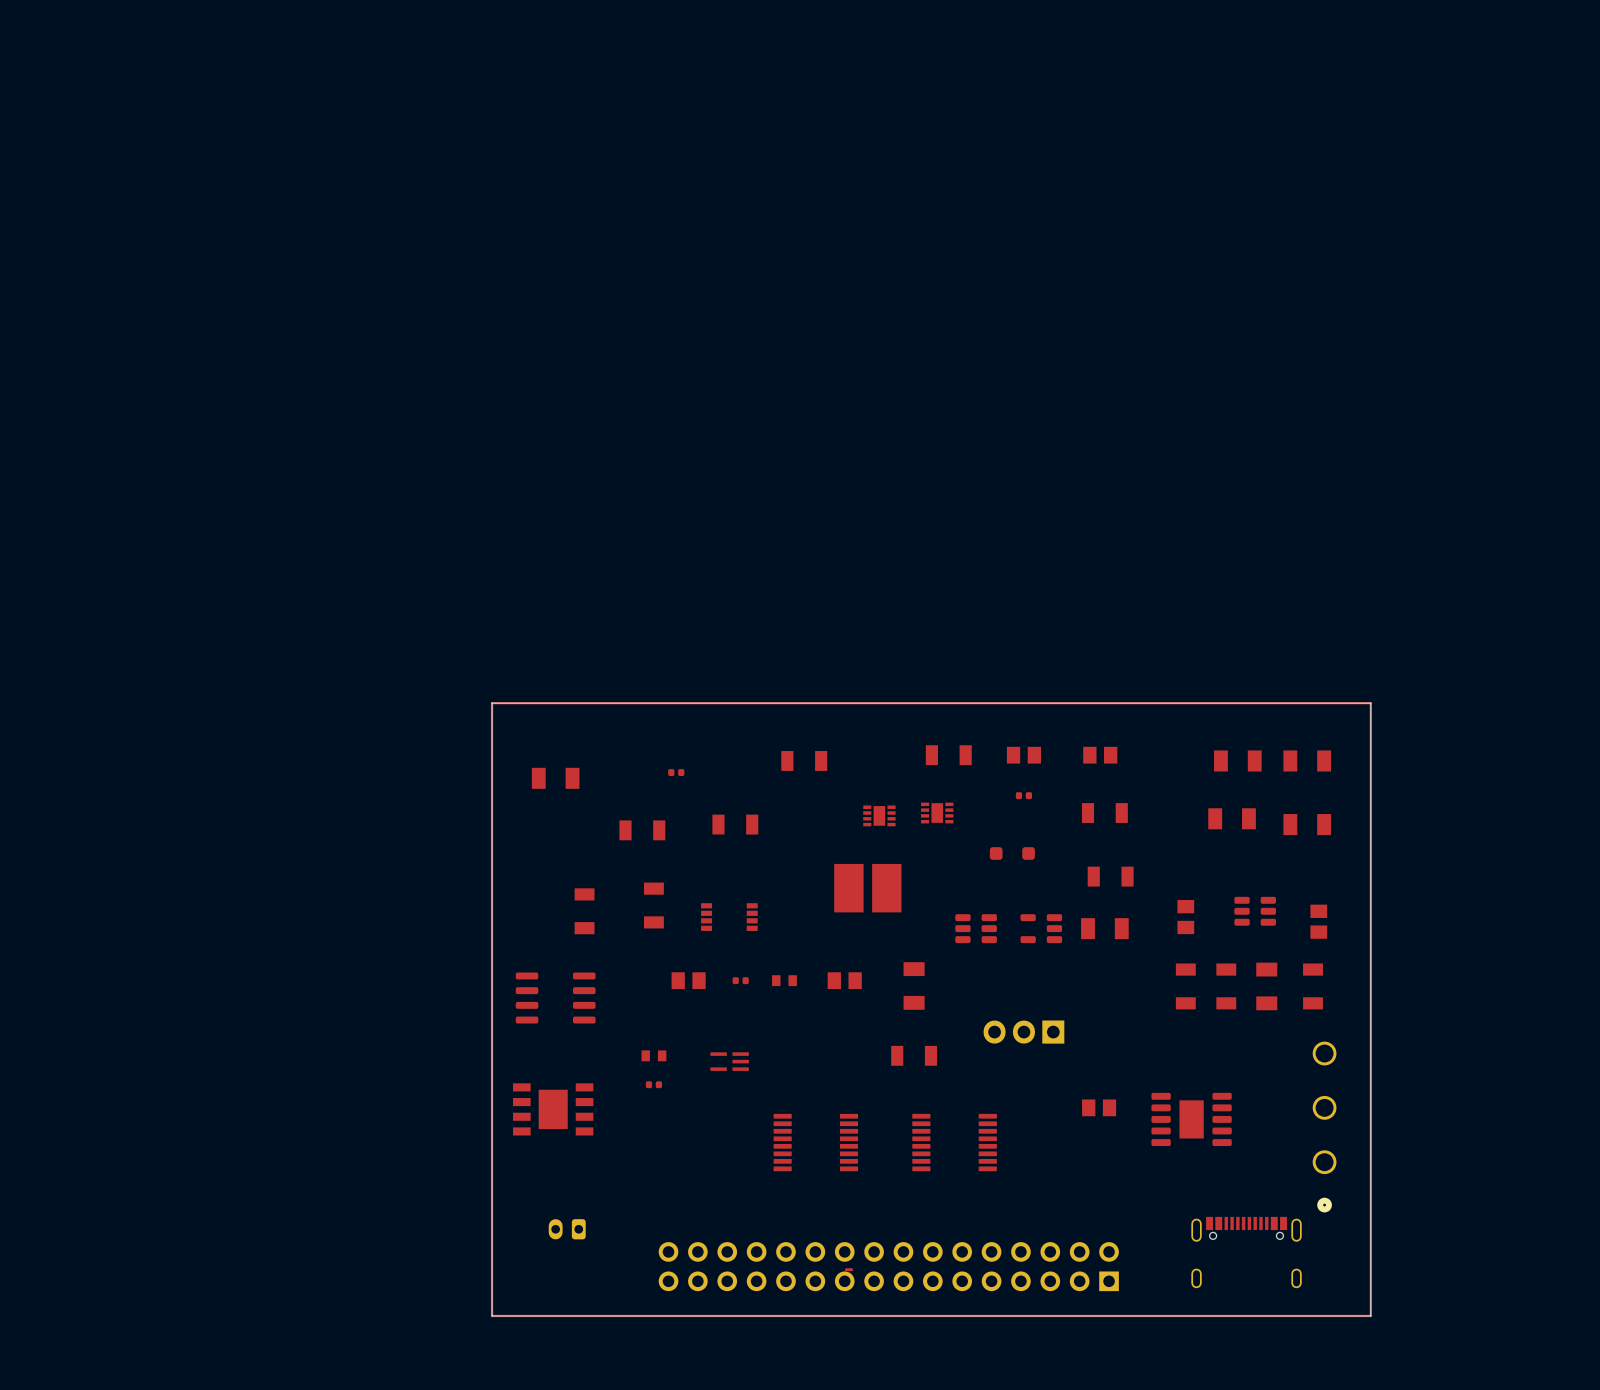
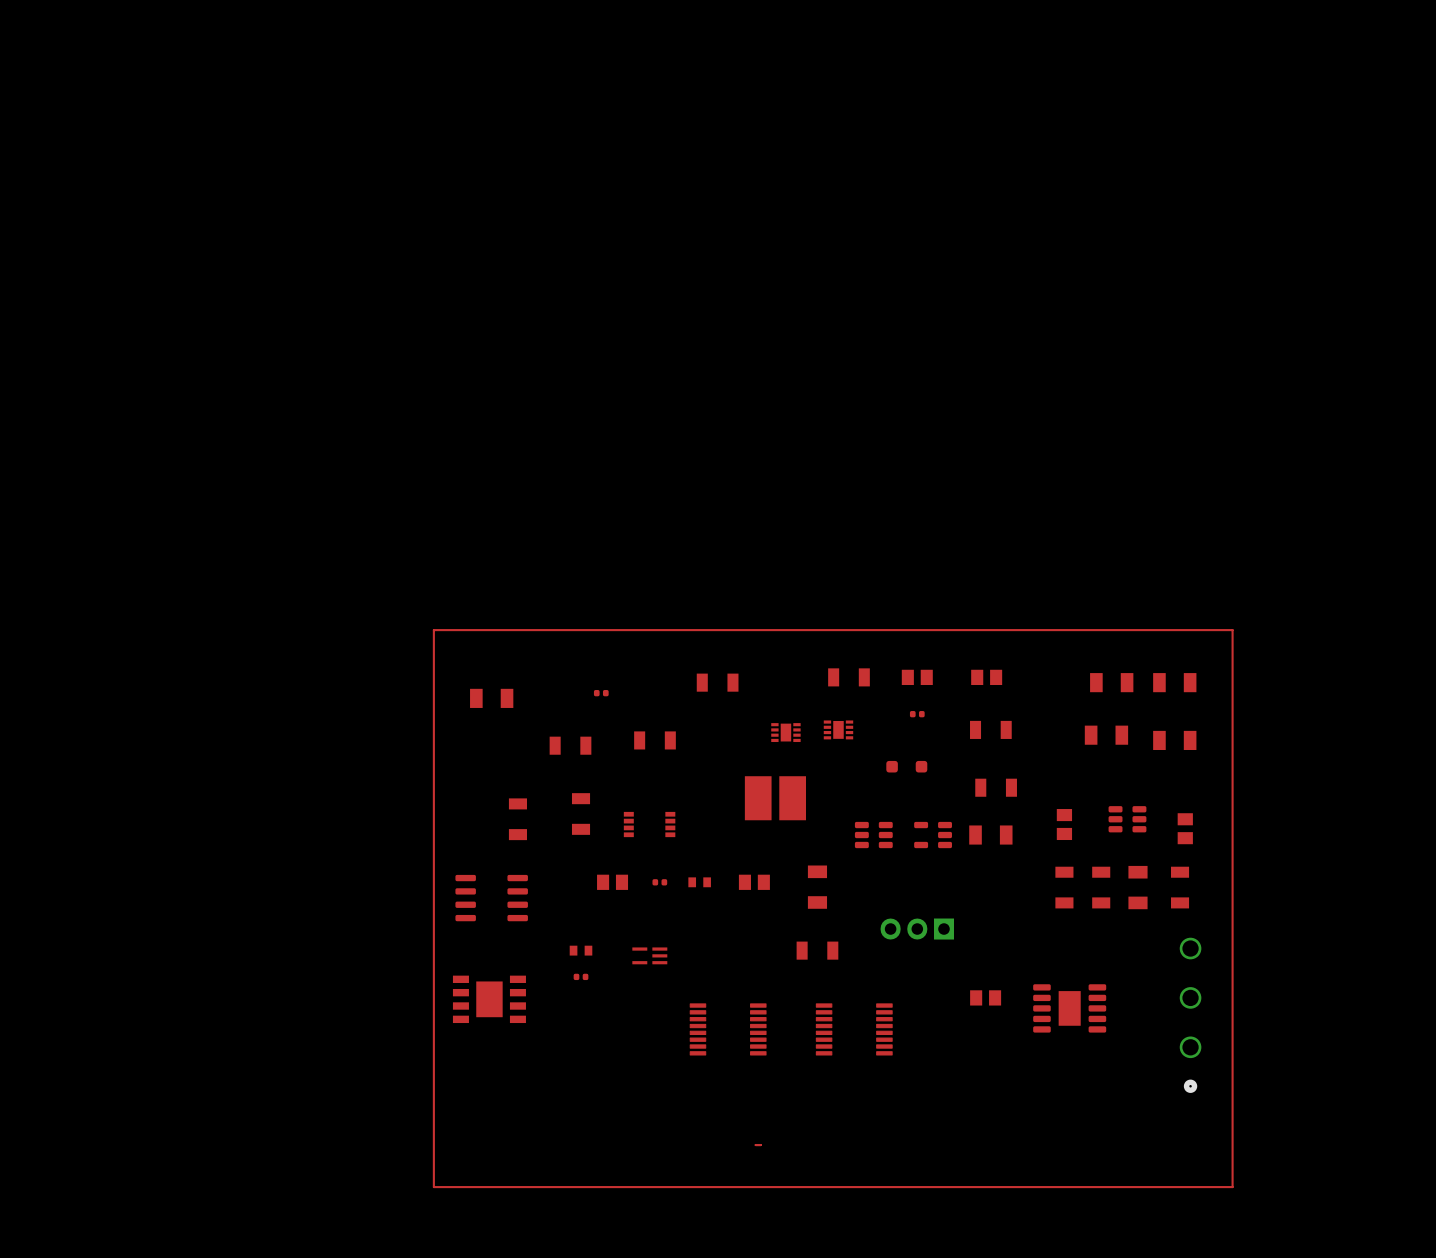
board edge: (1370, 703) (492, 703) (492, 1315) (1370, 1315) (1370, 703) -> none
part: (567, 1229) -> none
part: (1246, 1252) -> none
part: (888, 1266) -> none

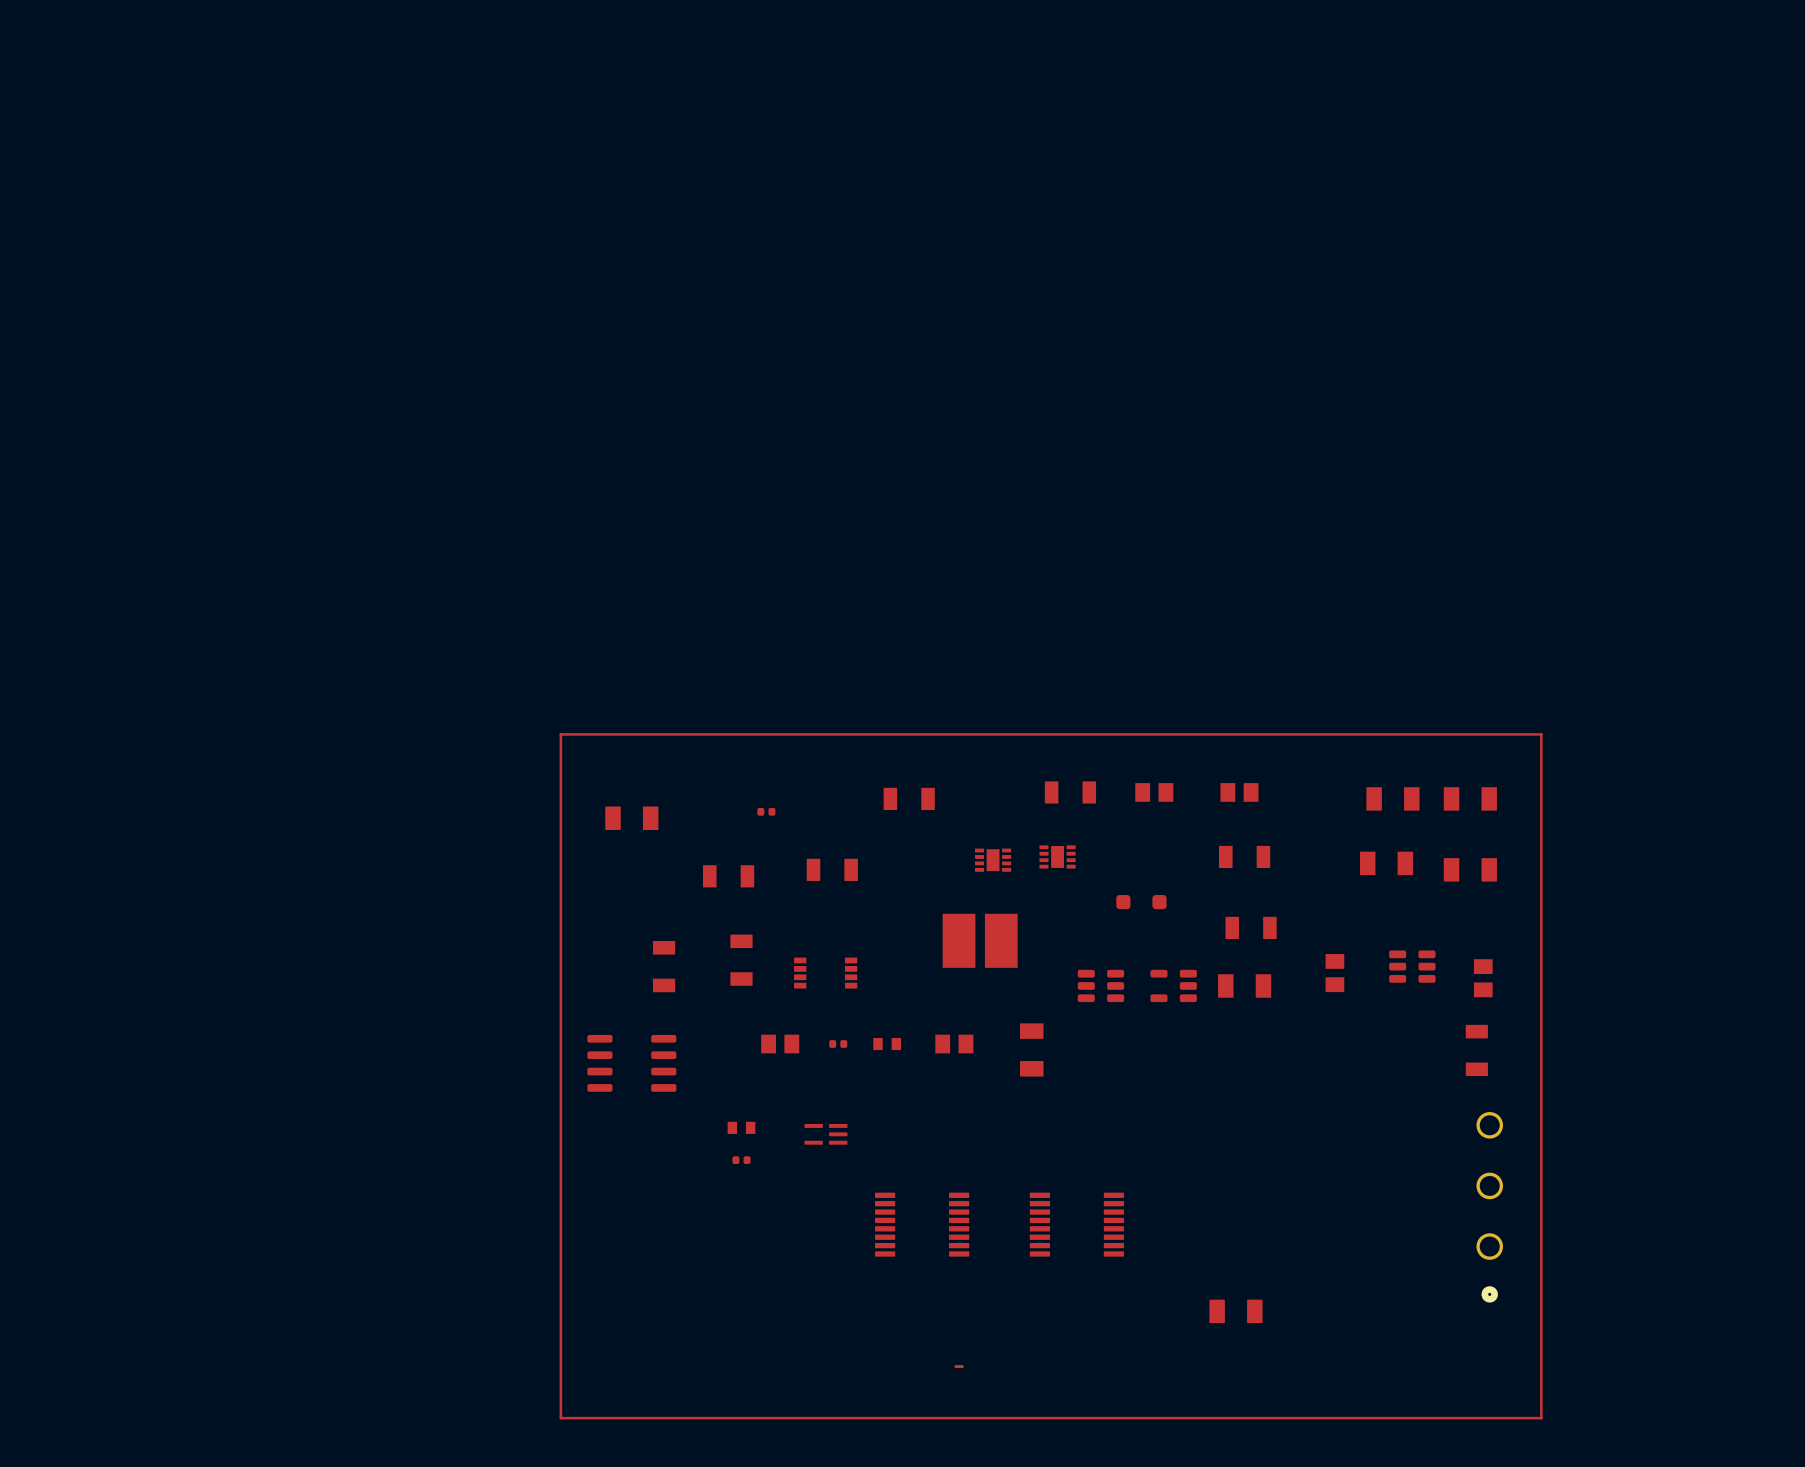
part: (917, 714) -> none
part: (1064, 887) -> none
part: (1101, 887) -> none
part rotation: 0° (1137, 887) -> 90° clockwise (1235, 1311)
part position: (1137, 887) -> (1235, 1311)
part: (917, 929) -> none
part: (817, 950) -> none
part: (985, 997) -> none
part: (489, 999) -> none
part: (1069, 1008) -> none

